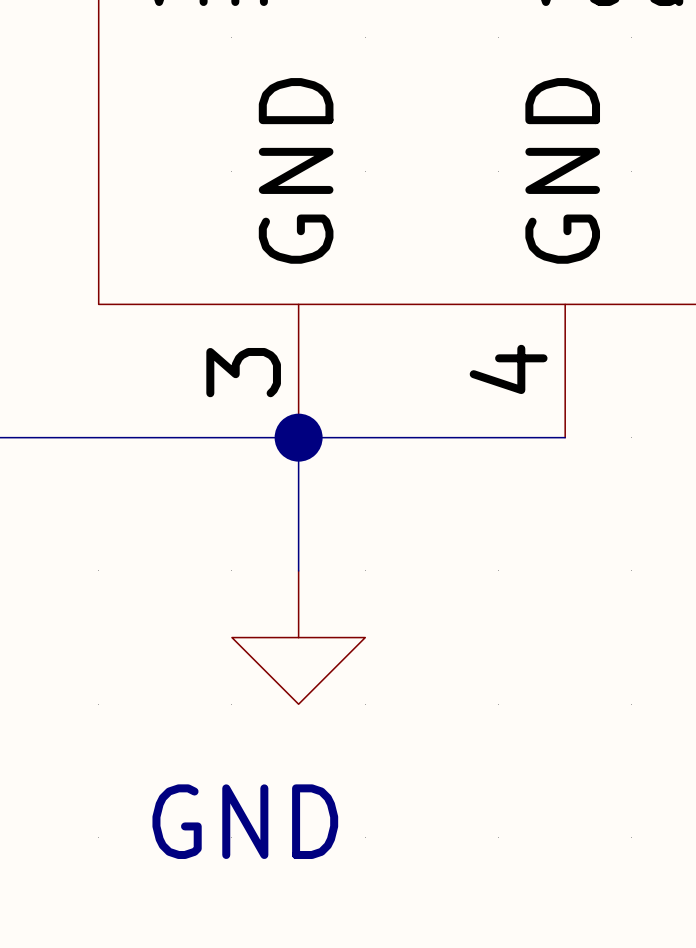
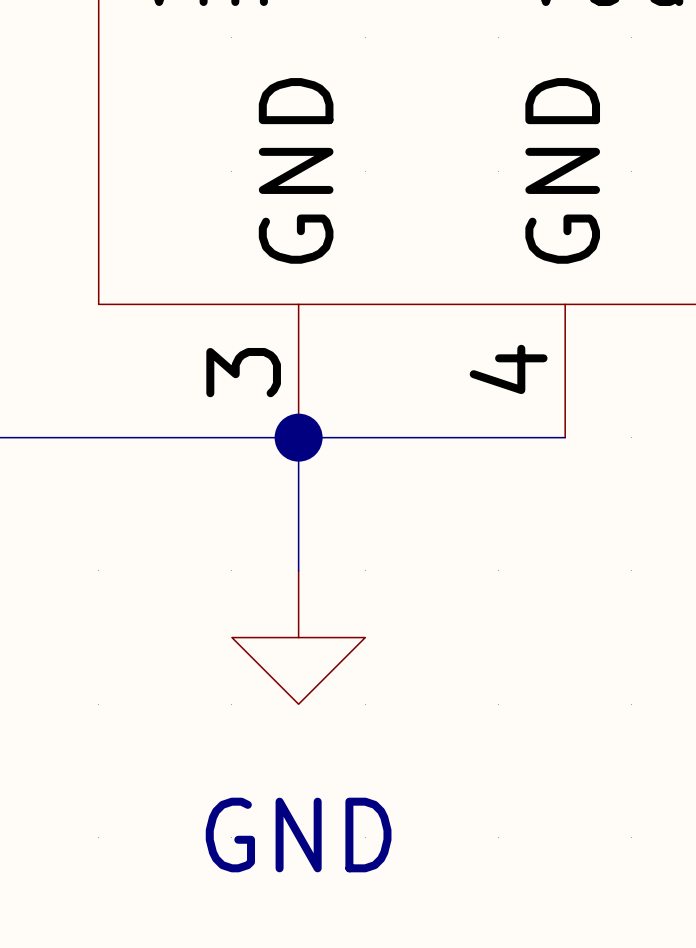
power symbol text position: GND (245, 821) -> GND (298, 835)

